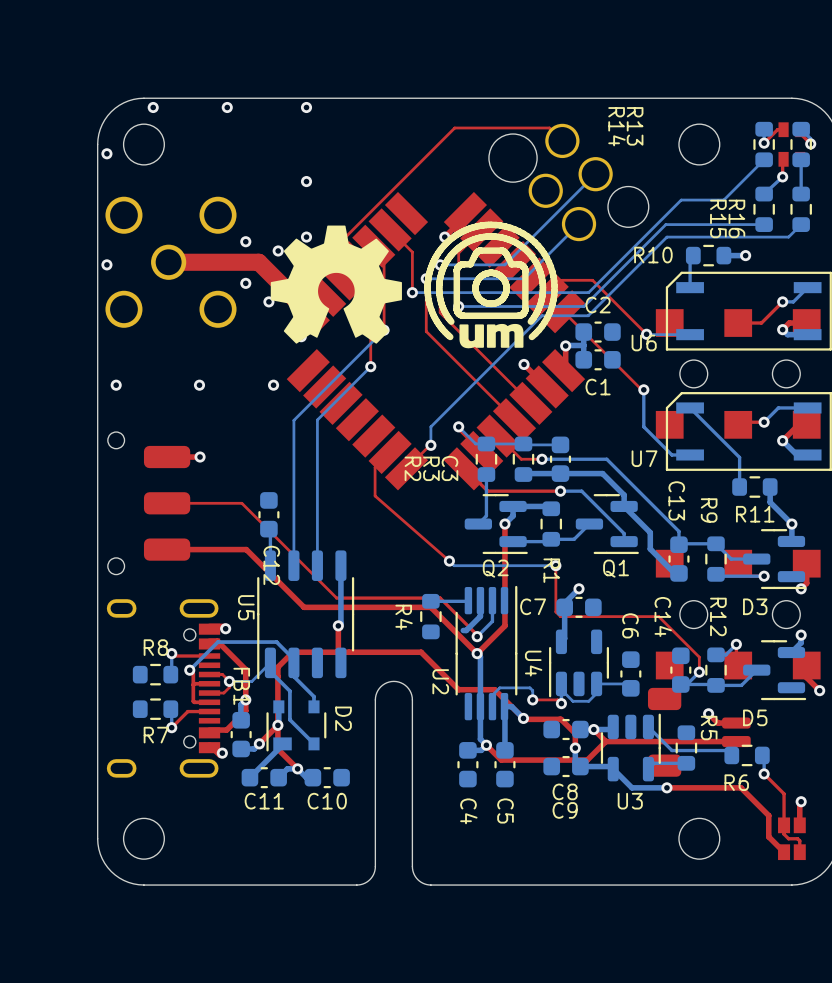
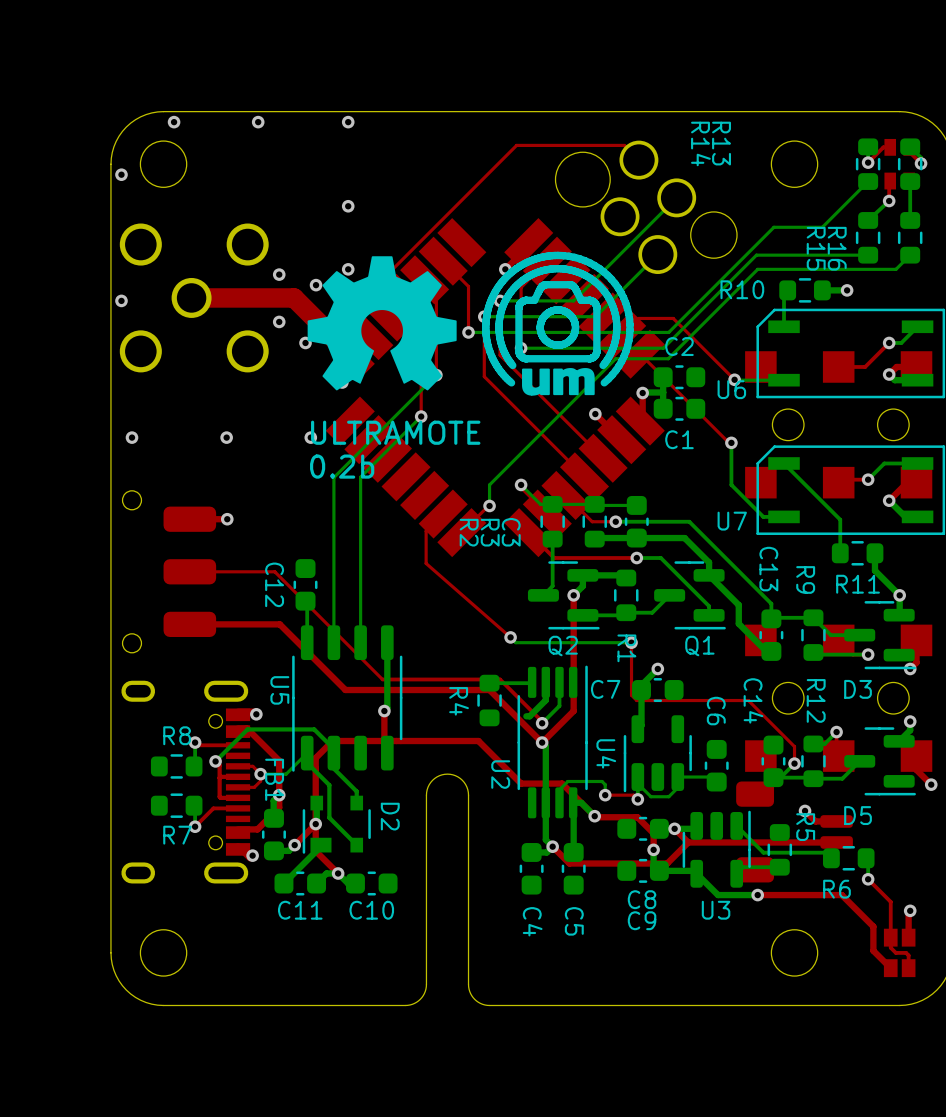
text: none -> ULTRAMOTE (395, 432)
text: none -> 0.2b (342, 466)
C12 name position: C12 (271, 565) -> C12 (274, 584)

